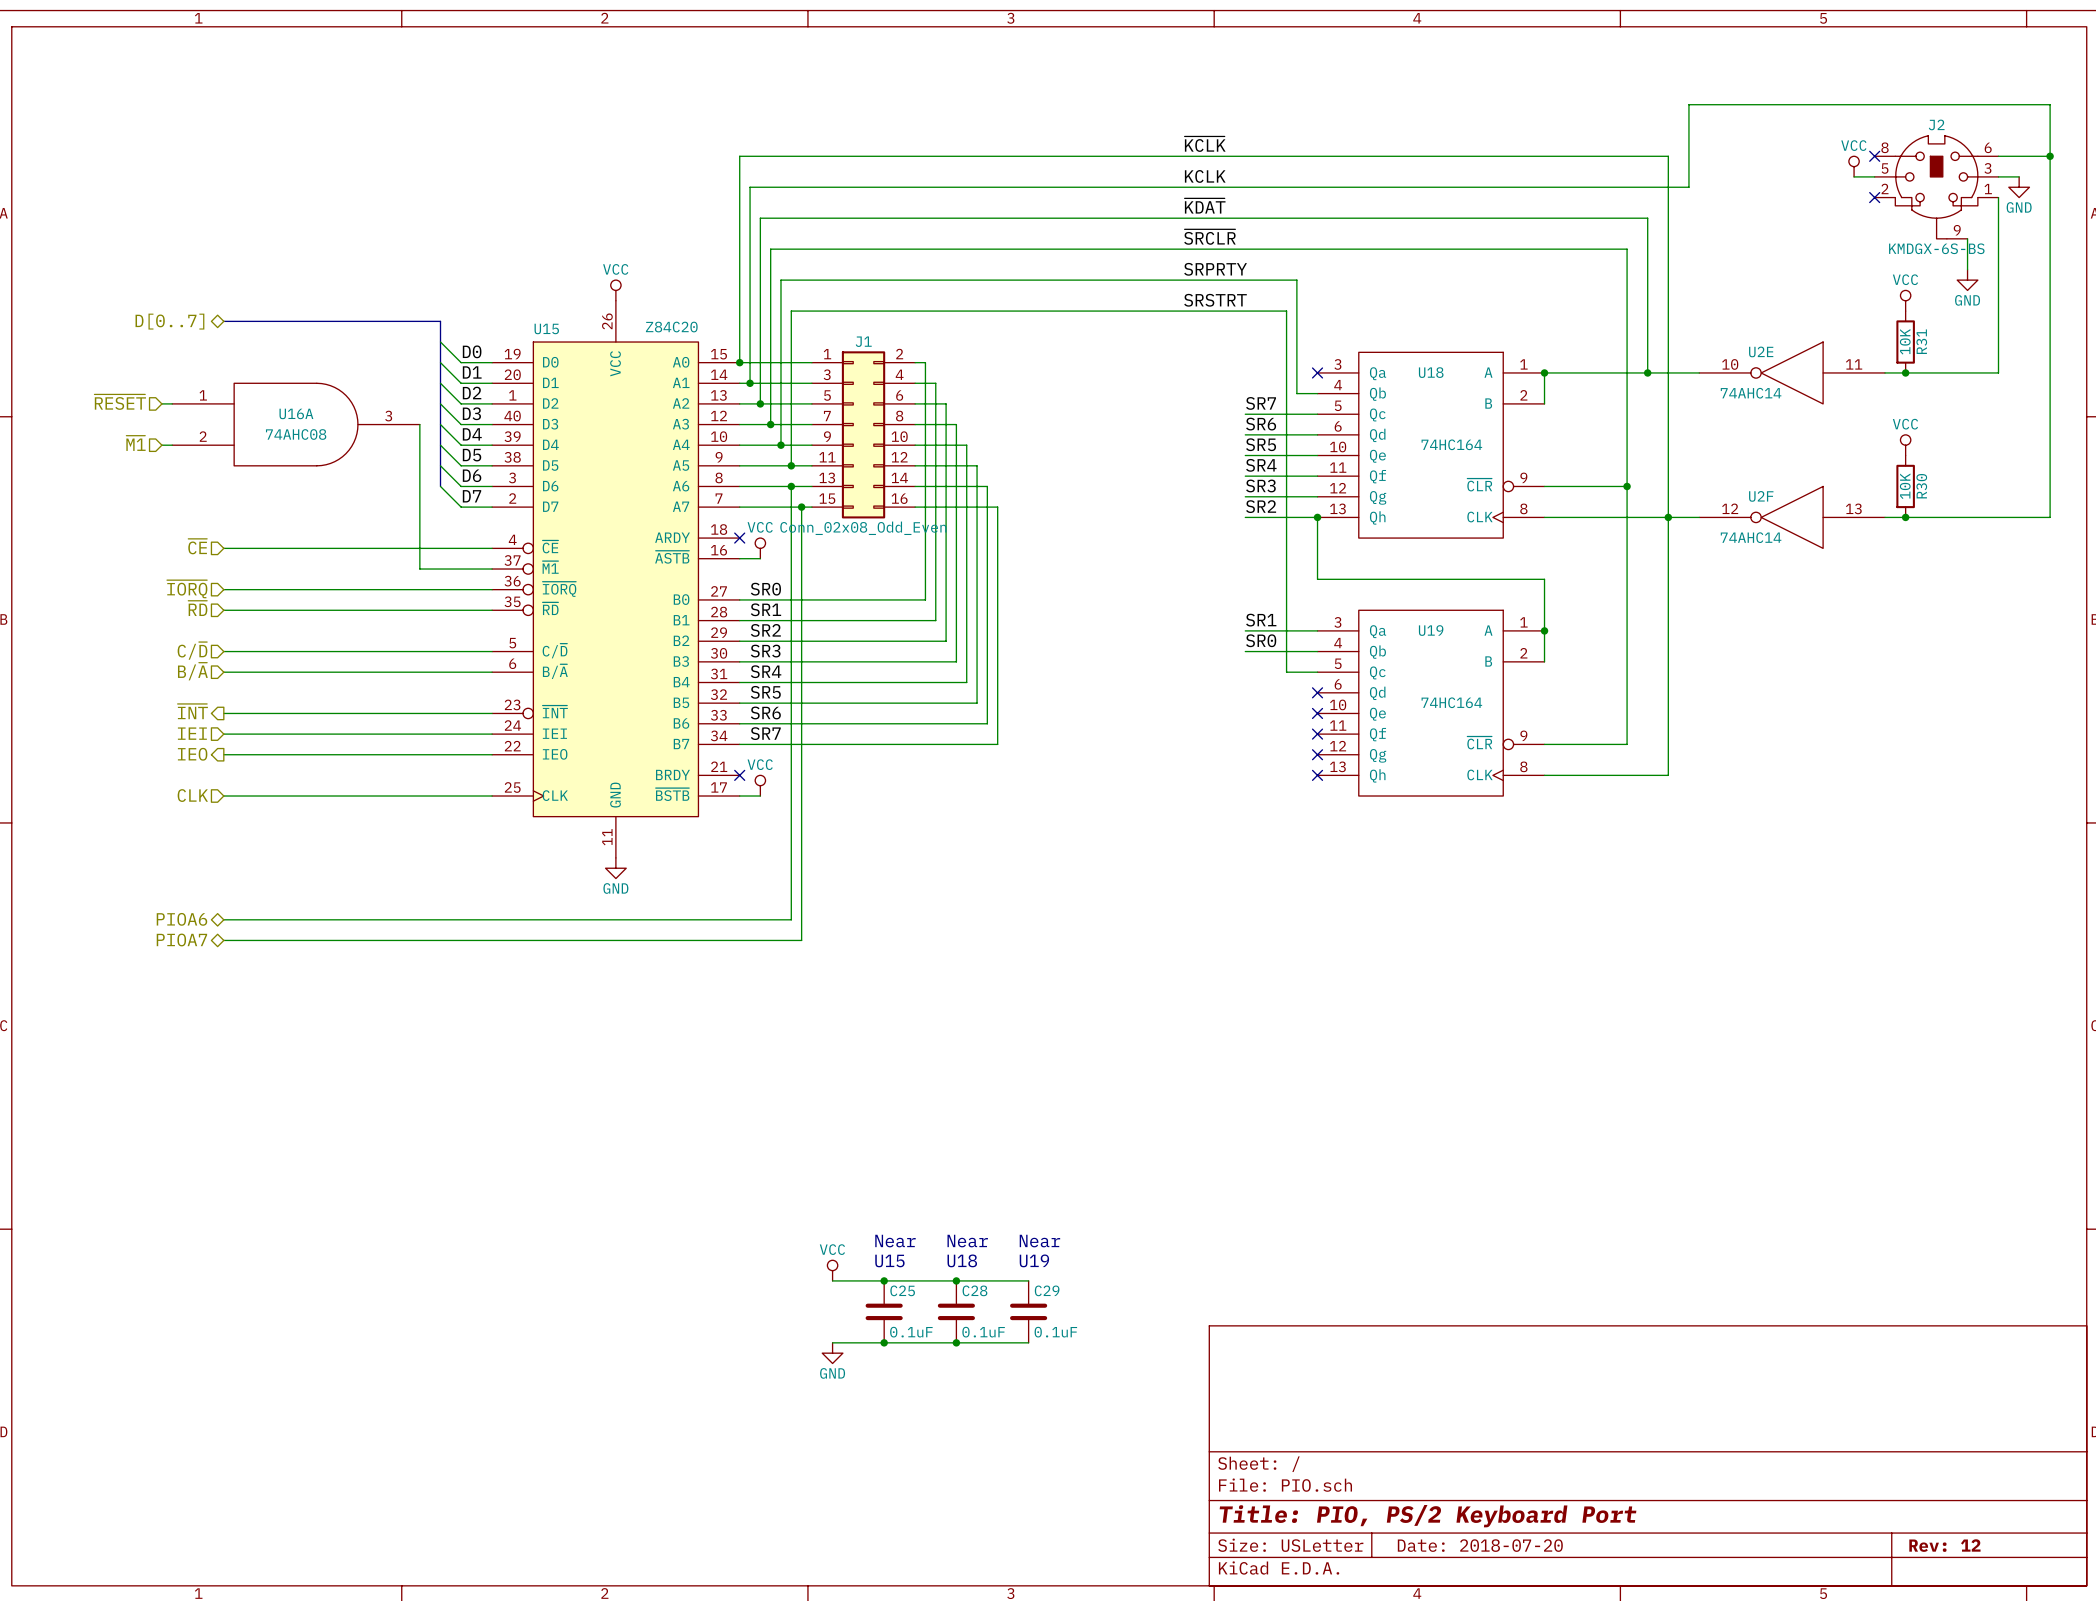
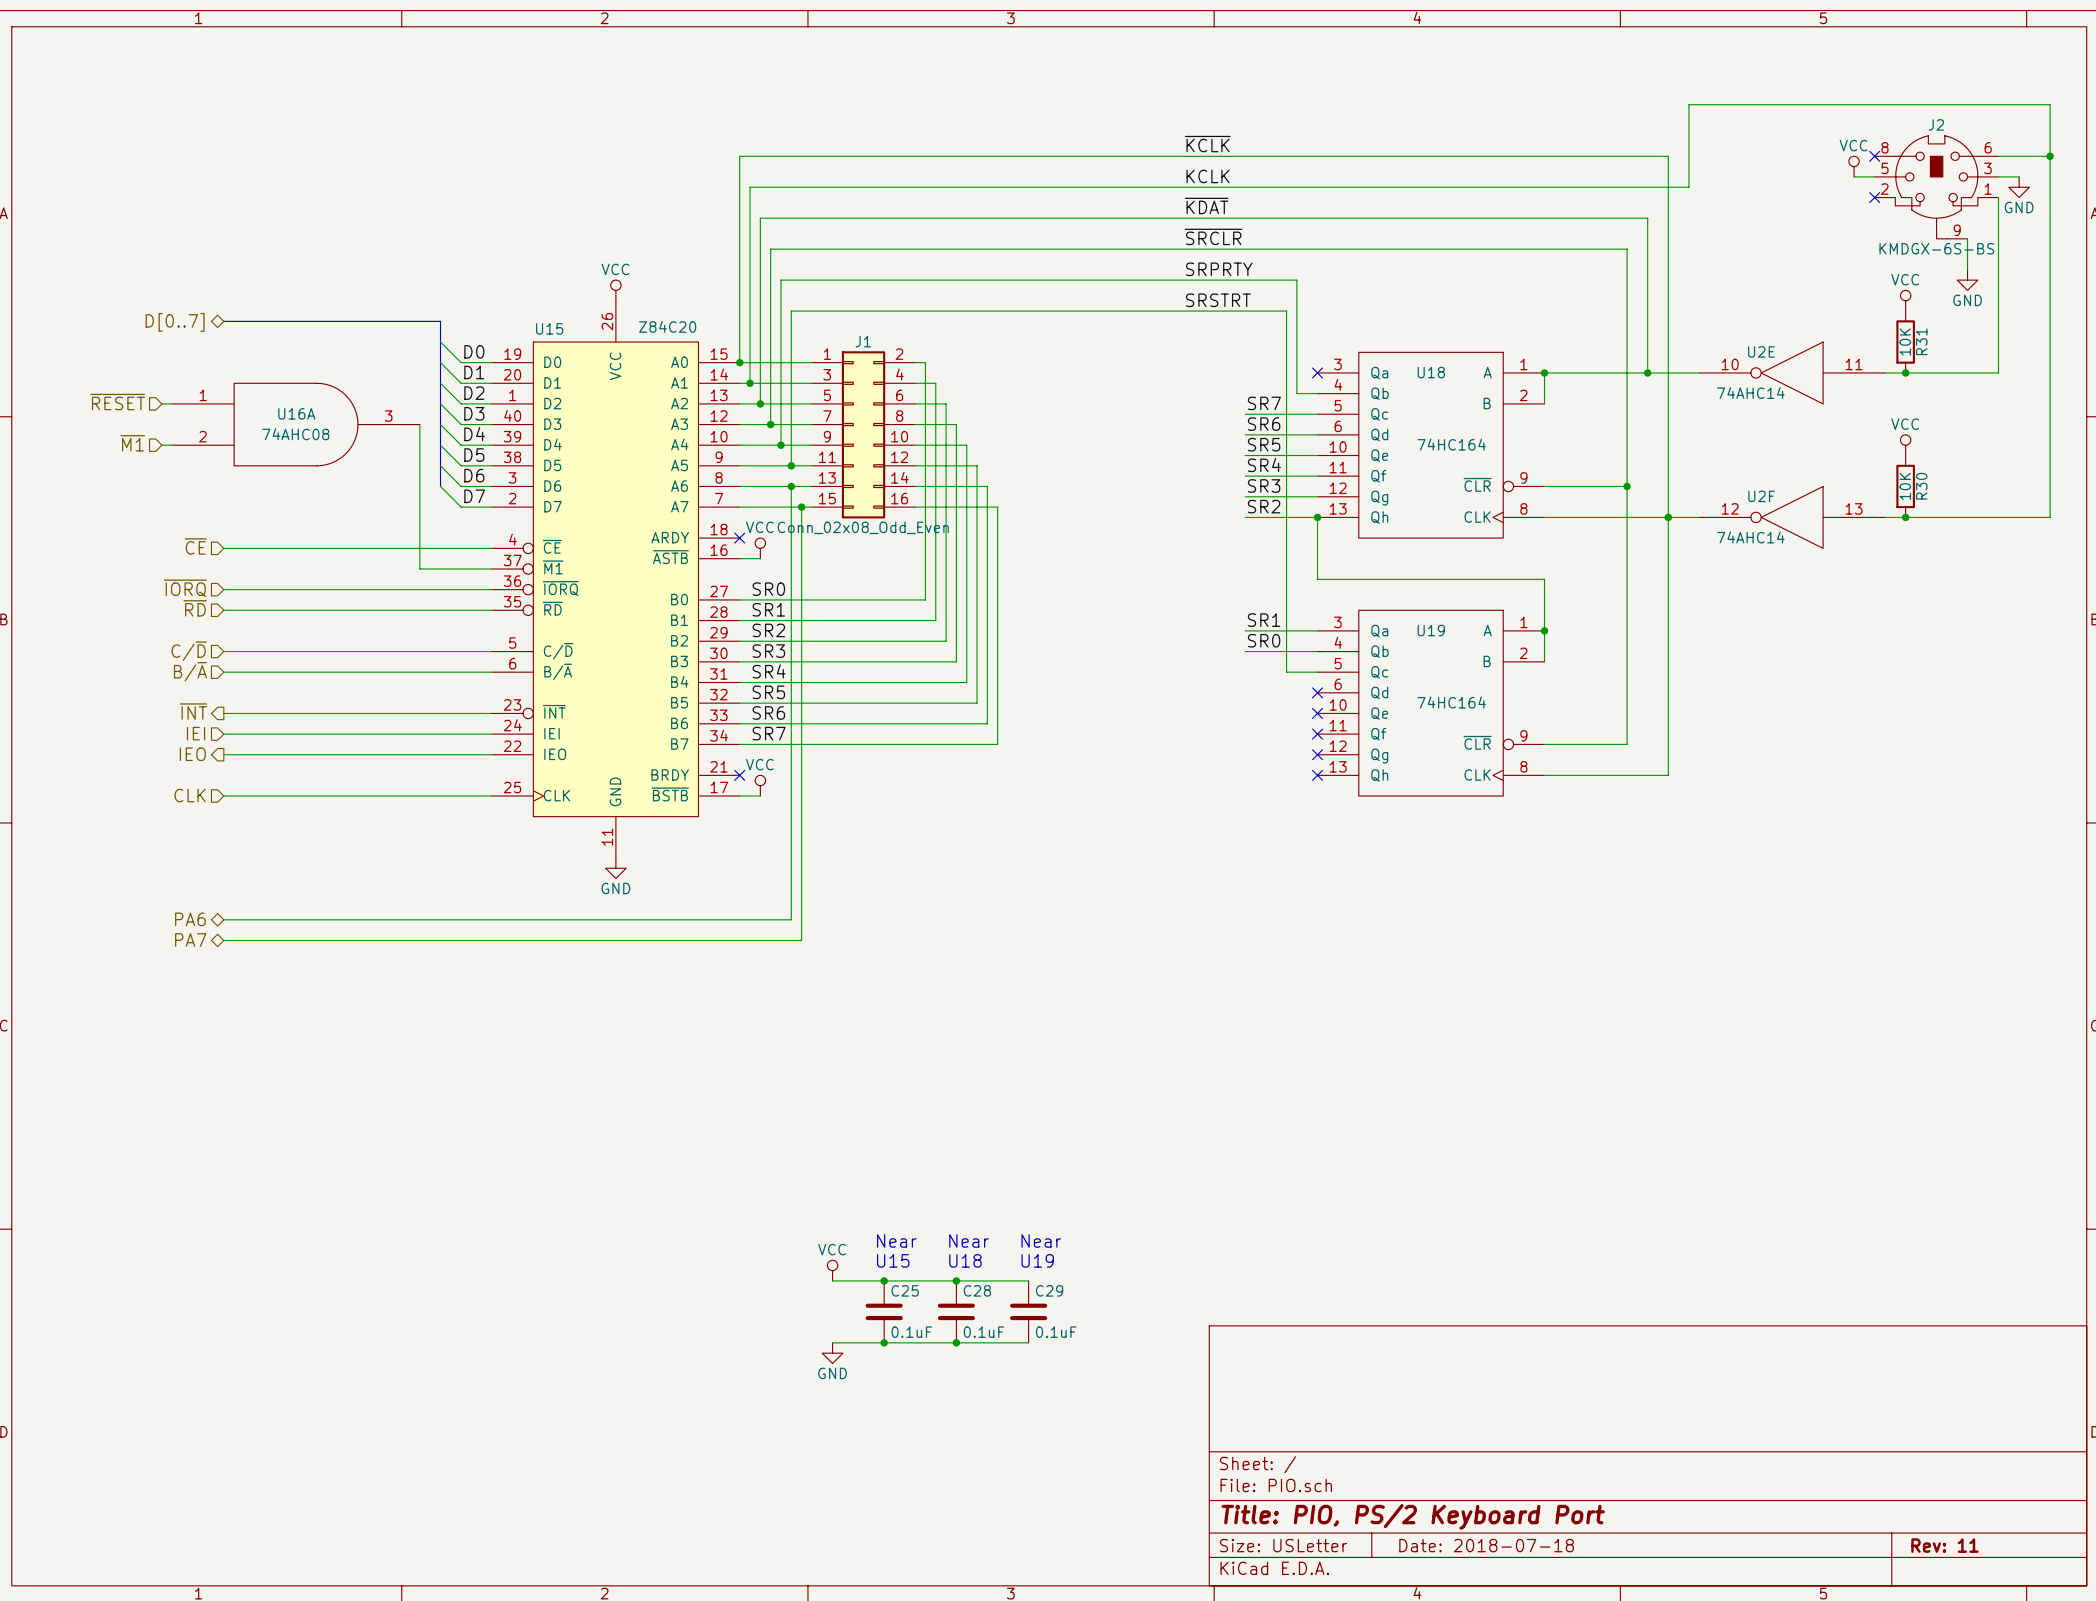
hierarchical label: PIOA6 (181, 919) -> PA6 (190, 919)
hierarchical label: PIOA7 (181, 939) -> PA7 (190, 939)
title block: Date: 2018-07-20 (1480, 1545) -> Date: 2018-07-18 (1486, 1545)
title block: Rev: 12 (1944, 1545) -> Rev: 11 (1945, 1545)

